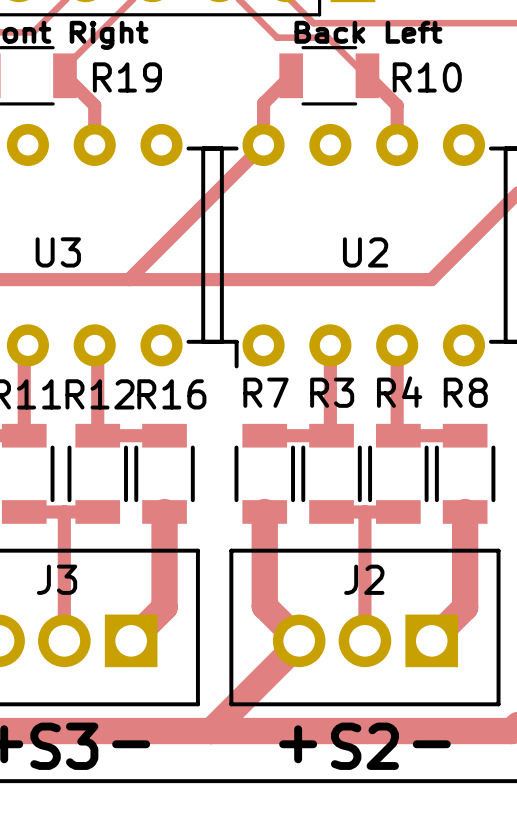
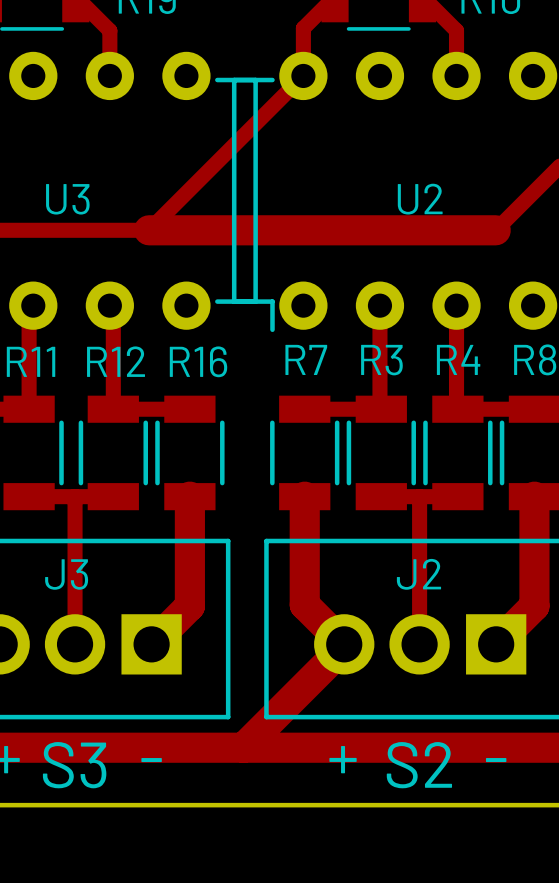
top track width: thin (128, 279) (431, 279) -> thick (149, 230) (495, 230)

